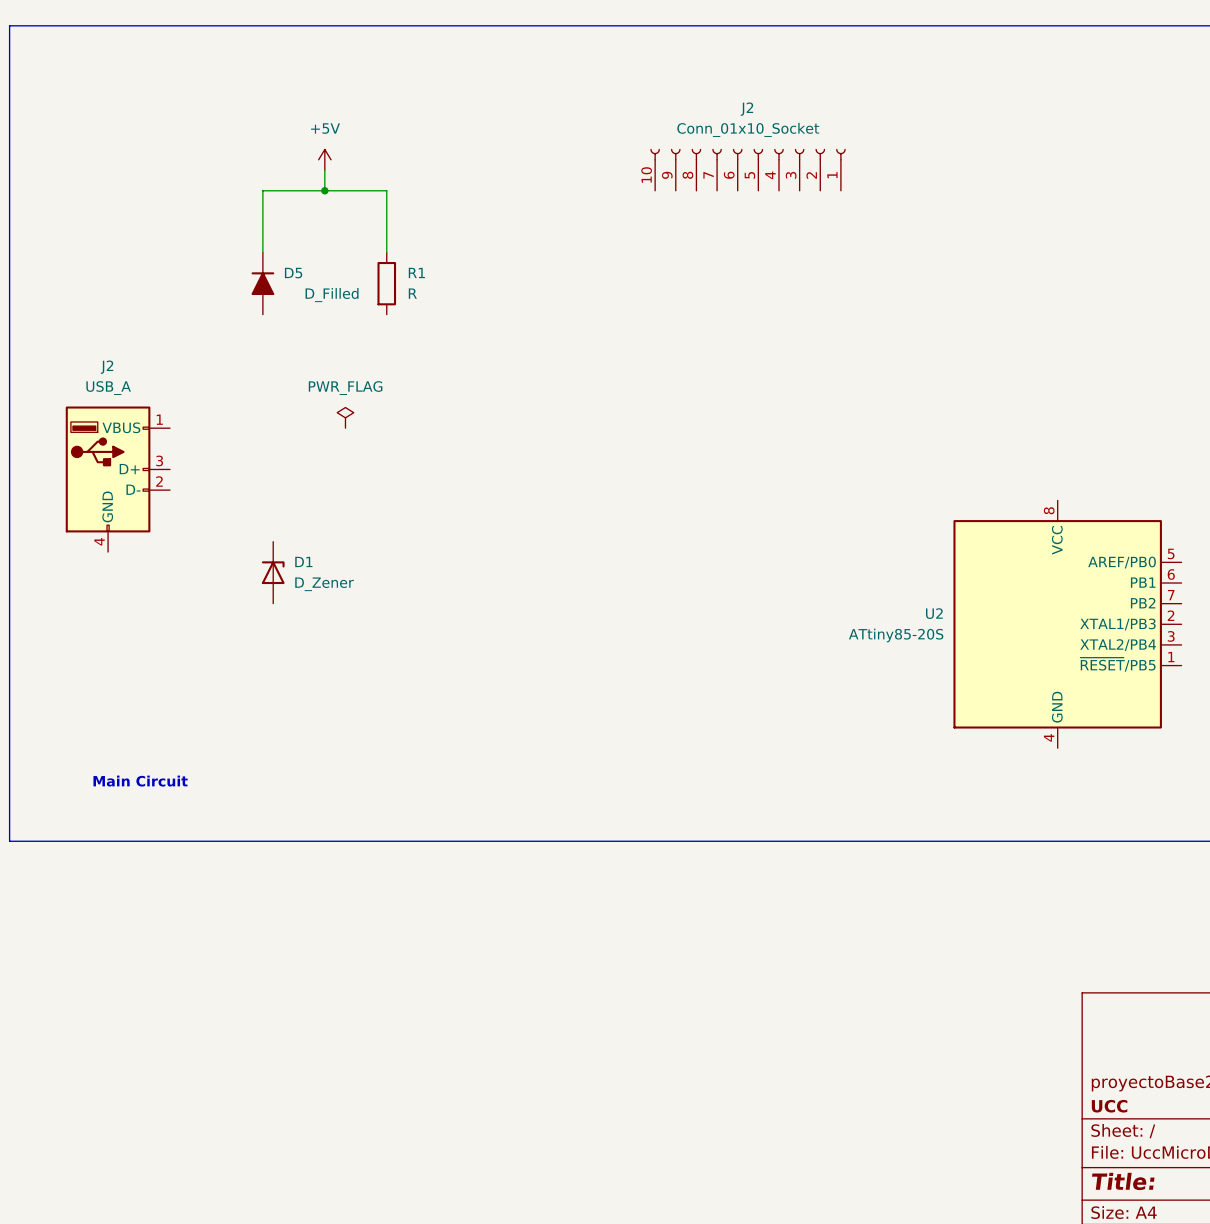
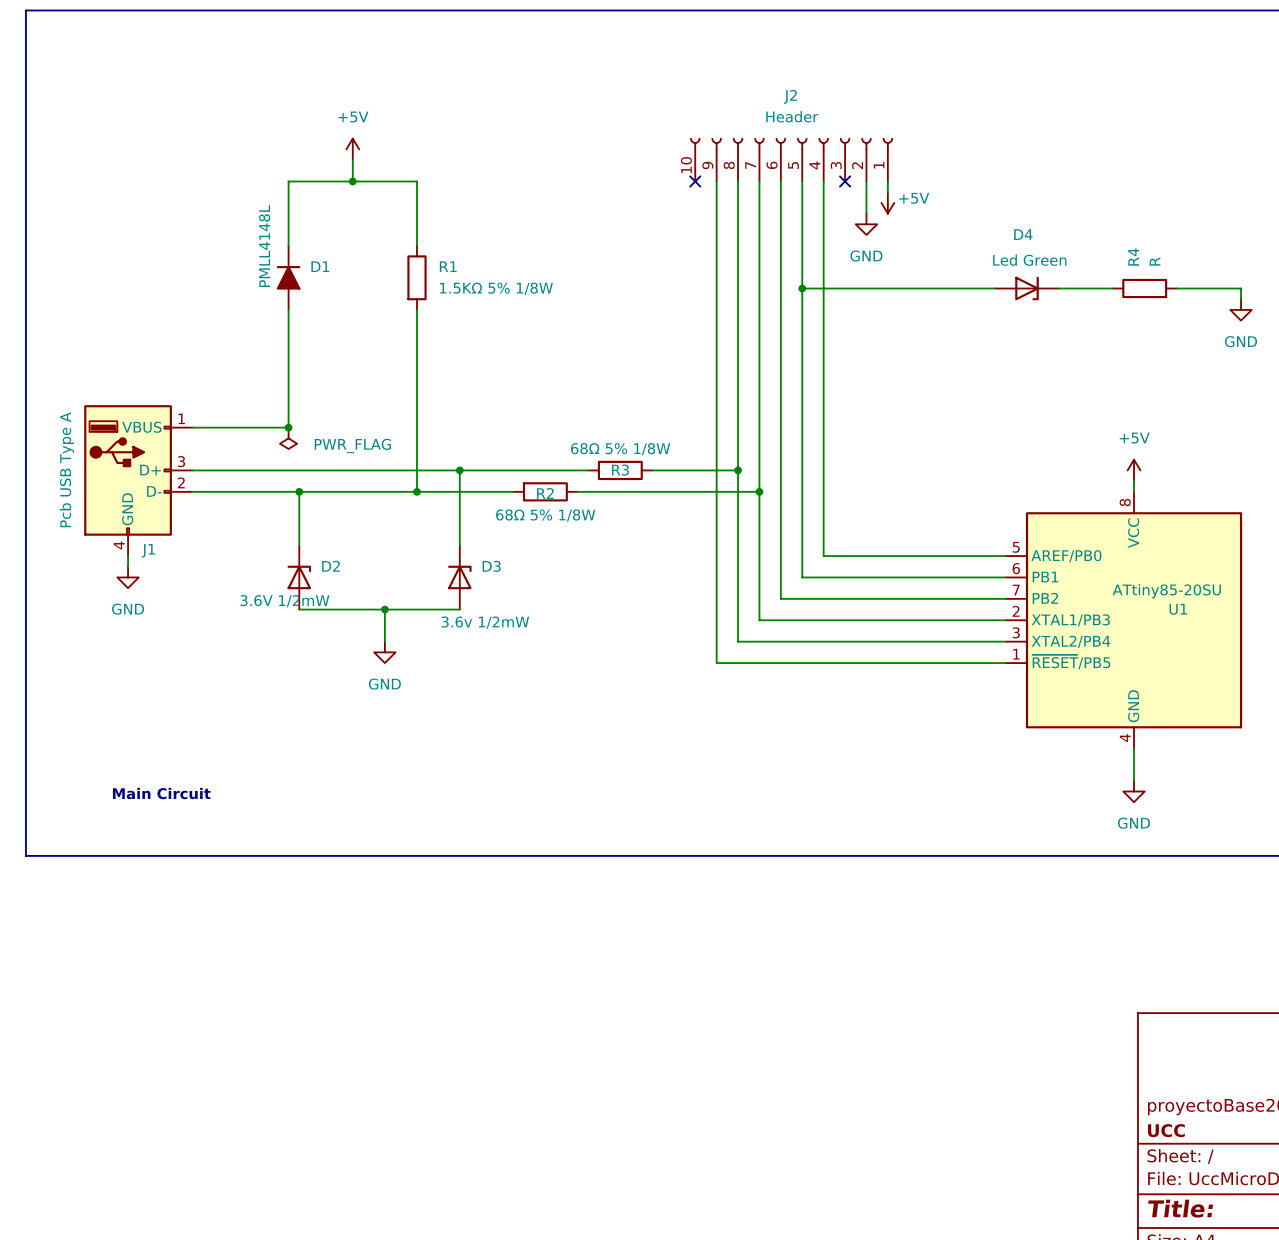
J2 value: Conn_01x10_Socket (748, 129) -> Header (792, 116)
no-connect mark: none -> (695, 181)
wire: none -> (716, 181) (716, 663) (1005, 663)
wire: none -> (738, 181) (738, 641) (1005, 641)
wire: none -> (759, 181) (759, 620) (1005, 620)
wire: none -> (780, 181) (780, 598) (1005, 598)
wire: none -> (802, 181) (802, 577) (1005, 577)
wire: none -> (823, 181) (823, 556) (1005, 556)
no-connect mark: none -> (845, 181)
wire: none -> (866, 181) (866, 213)
wire: none -> (887, 181) (887, 192)
power symbol: none -> +5V (887, 202)
power symbol: none -> GND (866, 224)
D5 name: D5 (293, 273) -> D1 (320, 266)
R1 value: R (412, 293) -> 1.5KΩ 5% 1/8W (496, 288)
wire: none -> (802, 288) (994, 288)
junction: none -> (802, 288)
D4: none -> Led Green (1027, 288)
wire: none -> (1059, 288) (1112, 288)
R4: none -> R (1144, 288)
wire: none -> (1176, 288) (1241, 288) (1241, 299)
D5 value: D_Filled (332, 295) -> PMLL4148L (264, 246)
wire: none -> (288, 309) (288, 427) (192, 427)
wire: none -> (417, 309) (417, 491)
power symbol: none -> GND (1241, 309)
J2 name: J2 (106, 367) -> J1 (148, 550)
J2 value: USB_A (108, 388) -> Pcb USB Type A (66, 469)
power symbol text position: PWR_FLAG (345, 388) -> PWR_FLAG (352, 445)
power symbol rotation: 0° (345, 417) -> 180° (288, 438)
power symbol position: PWR_FLAG (345, 417) -> PWR_FLAG (288, 438)
junction: none -> (288, 427)
wire: none -> (192, 470) (588, 470)
wire: none -> (459, 470) (459, 545)
junction: none -> (459, 470)
R3: none -> 68Ω 5% 1/8W (620, 470)
wire: none -> (652, 470) (738, 470)
junction: none -> (738, 470)
power symbol: none -> +5V (1134, 470)
wire: none -> (1134, 481) (1134, 491)
wire: none -> (192, 491) (513, 491)
wire: none -> (299, 491) (299, 545)
junction: none -> (299, 491)
junction: none -> (417, 491)
R2: none -> 68Ω 5% 1/8W (545, 491)
wire: none -> (577, 491) (759, 491)
junction: none -> (759, 491)
wire: none -> (128, 556) (128, 566)
D1 name: D1 (303, 561) -> D2 (330, 566)
power symbol: none -> GND (128, 577)
D3: none -> 3.6v 1/2mW (459, 577)
D1 value: D_Zener (324, 584) -> 3.6V 1/2mW (284, 601)
wire: none -> (299, 609) (459, 609)
wire: none -> (384, 609) (384, 641)
junction: none -> (384, 609)
U1: none -> ATtiny85-20SU (1123, 620)
U2: ATtiny85-20S (1067, 624) -> none
power symbol: none -> GND (384, 652)
wire: none -> (1134, 748) (1134, 780)
power symbol: none -> GND (1134, 791)

